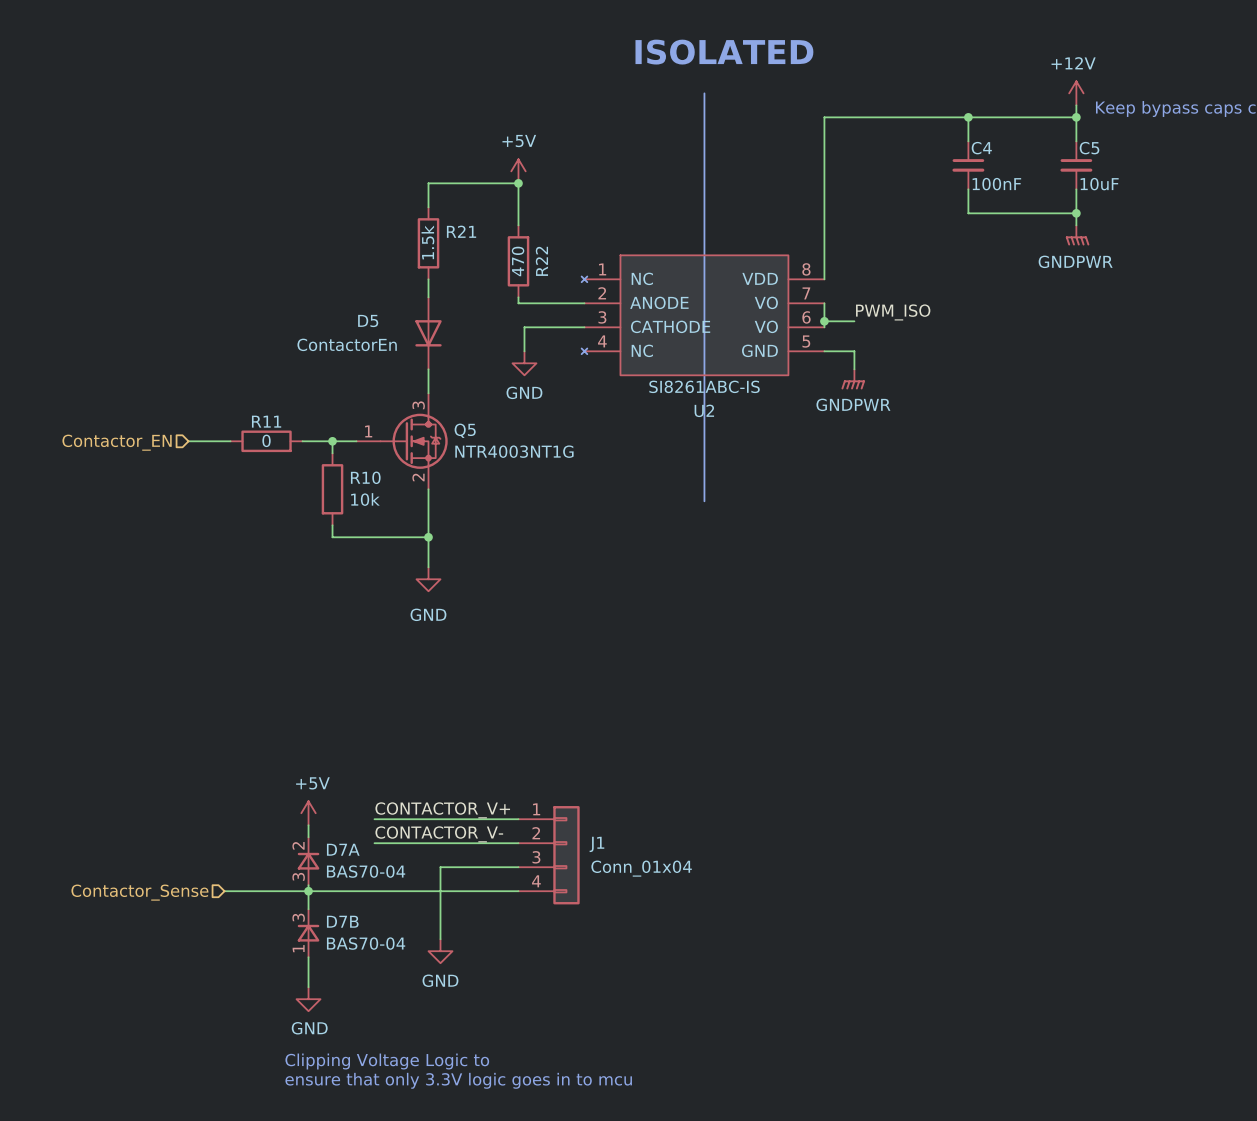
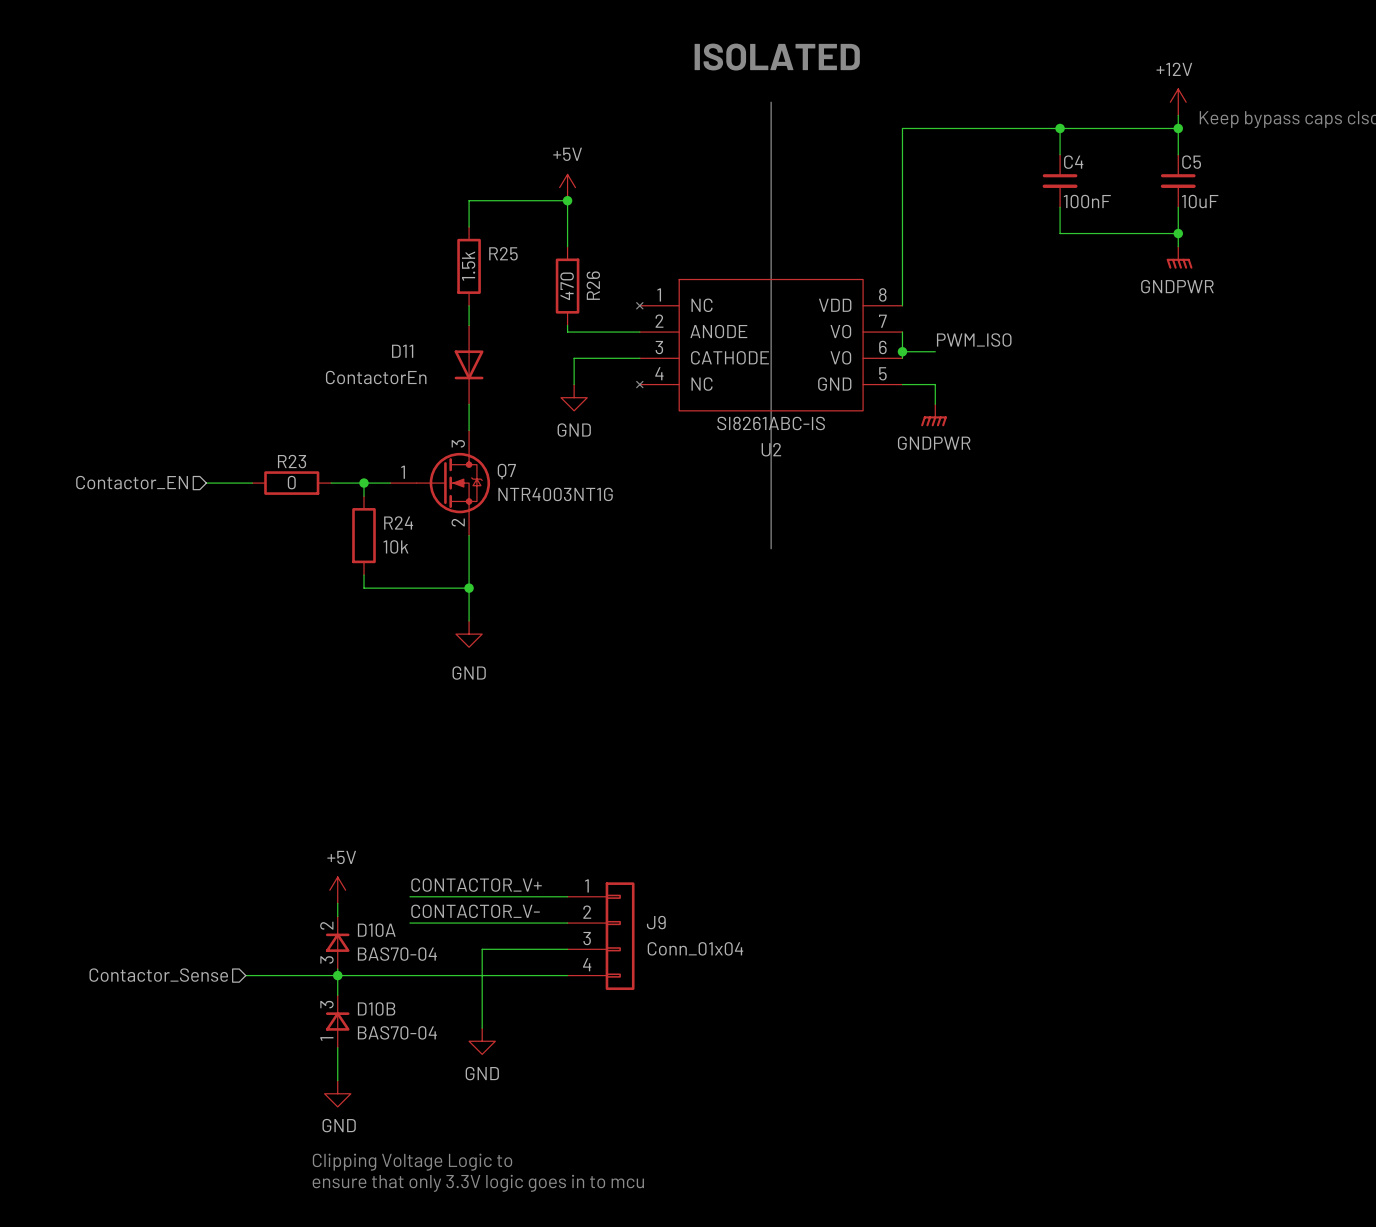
R21 name: R21 (461, 231) -> R25 (503, 253)
R22 name: R22 (541, 261) -> R26 (593, 285)
D5 name: D5 (368, 320) -> D11 (402, 351)
R11 name: R11 (266, 421) -> R23 (292, 461)
Q5 name: Q5 (465, 430) -> Q7 (506, 471)
R10 name: R10 (365, 477) -> R24 (398, 522)
J1 name: J1 (596, 844) -> J9 (656, 922)
D7A name: D7A (343, 849) -> D10A (376, 930)
D7B name: D7B (342, 921) -> D10B (376, 1008)

